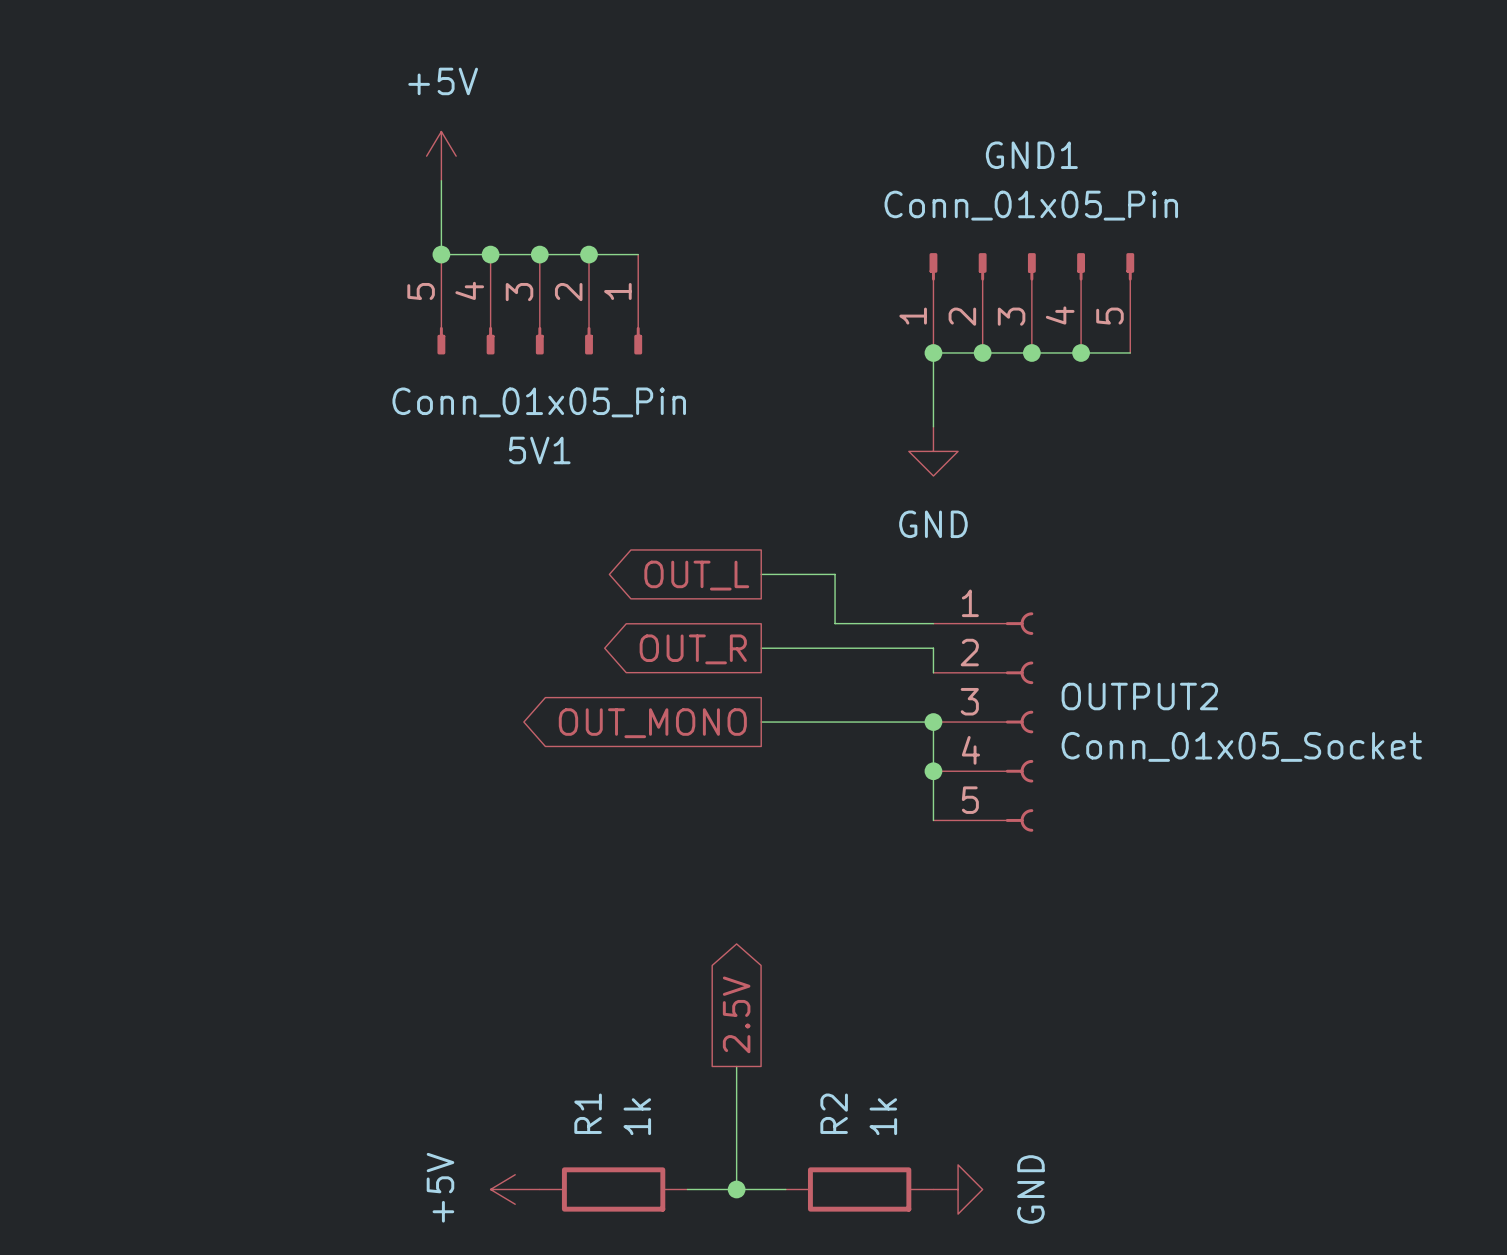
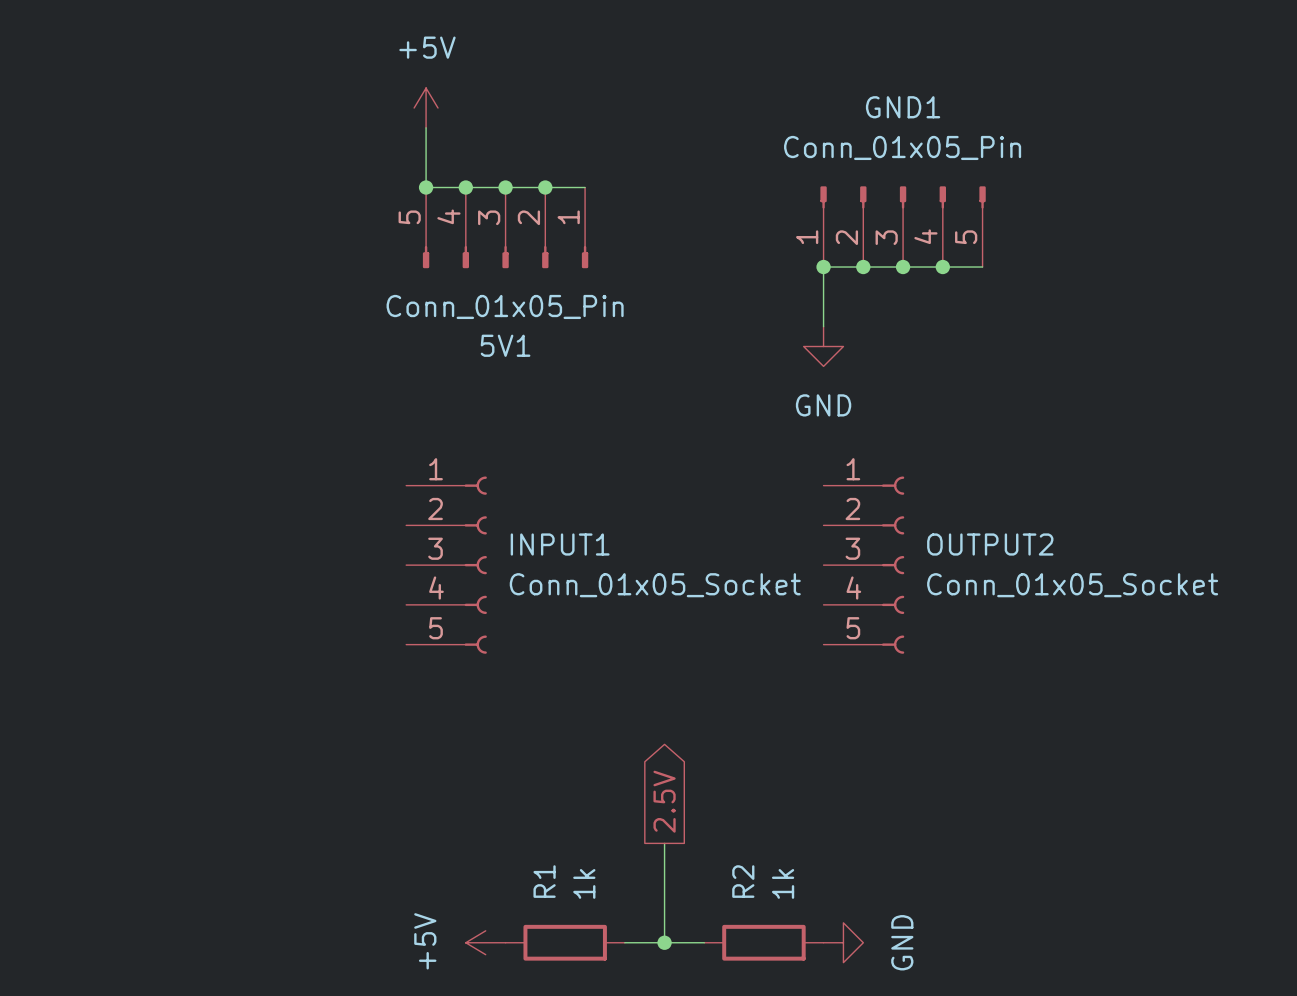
wire: (761, 574) (835, 574) (835, 623) (933, 623) -> none
global label: OUT_L (696, 575) -> none
wire: (761, 648) (933, 648) (933, 672) -> none
global label: OUT_R (693, 649) -> none
INPUT1: none -> Conn_01x05_Socket (446, 565)
wire: (761, 722) (933, 722) (933, 820) -> none
junction: (933, 722) -> none
global label: OUT_MONO (652, 723) -> none
junction: (933, 771) -> none

